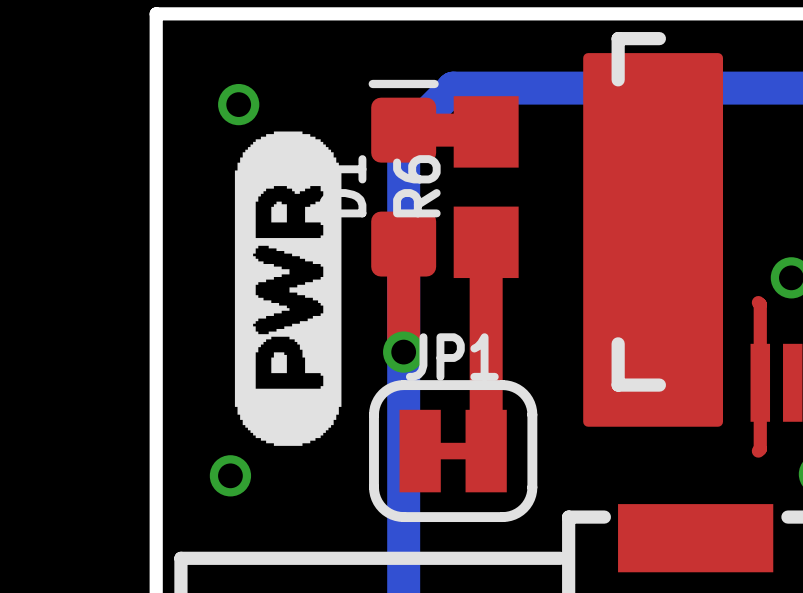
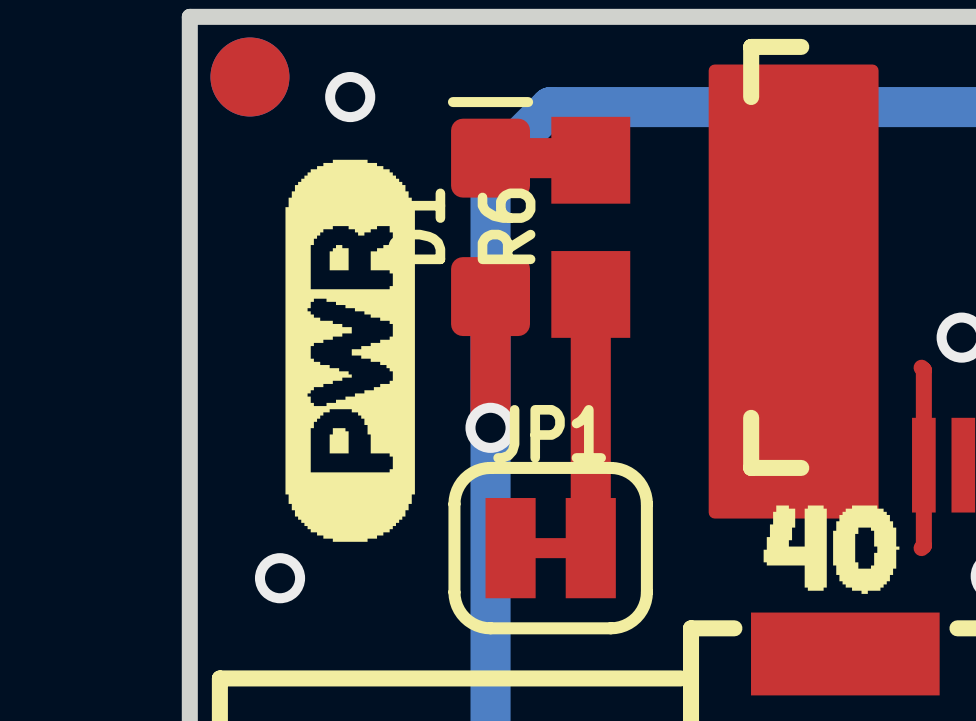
part: none -> (249, 76)
via position: (238, 104) -> (350, 97)
drawing: none -> [763, 505, 900, 594]

